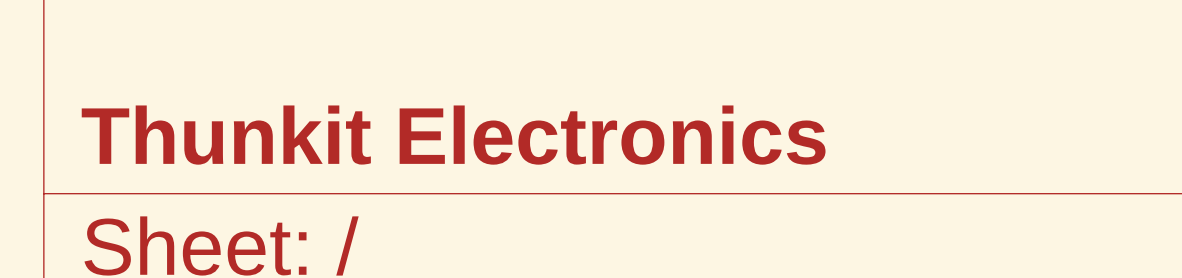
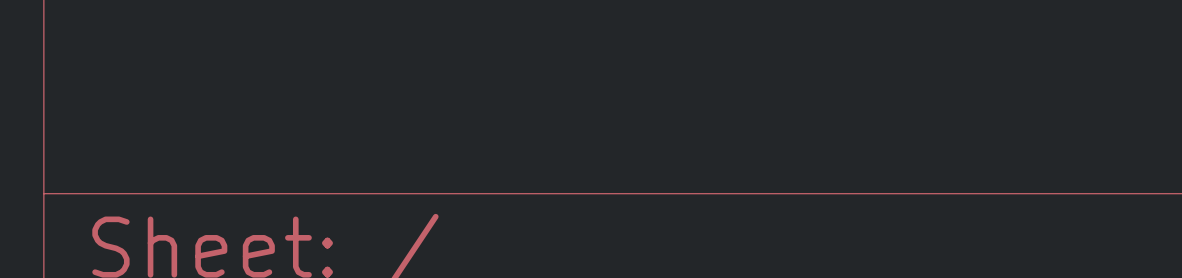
title block: Thunkit Electronics (453, 135) -> none

